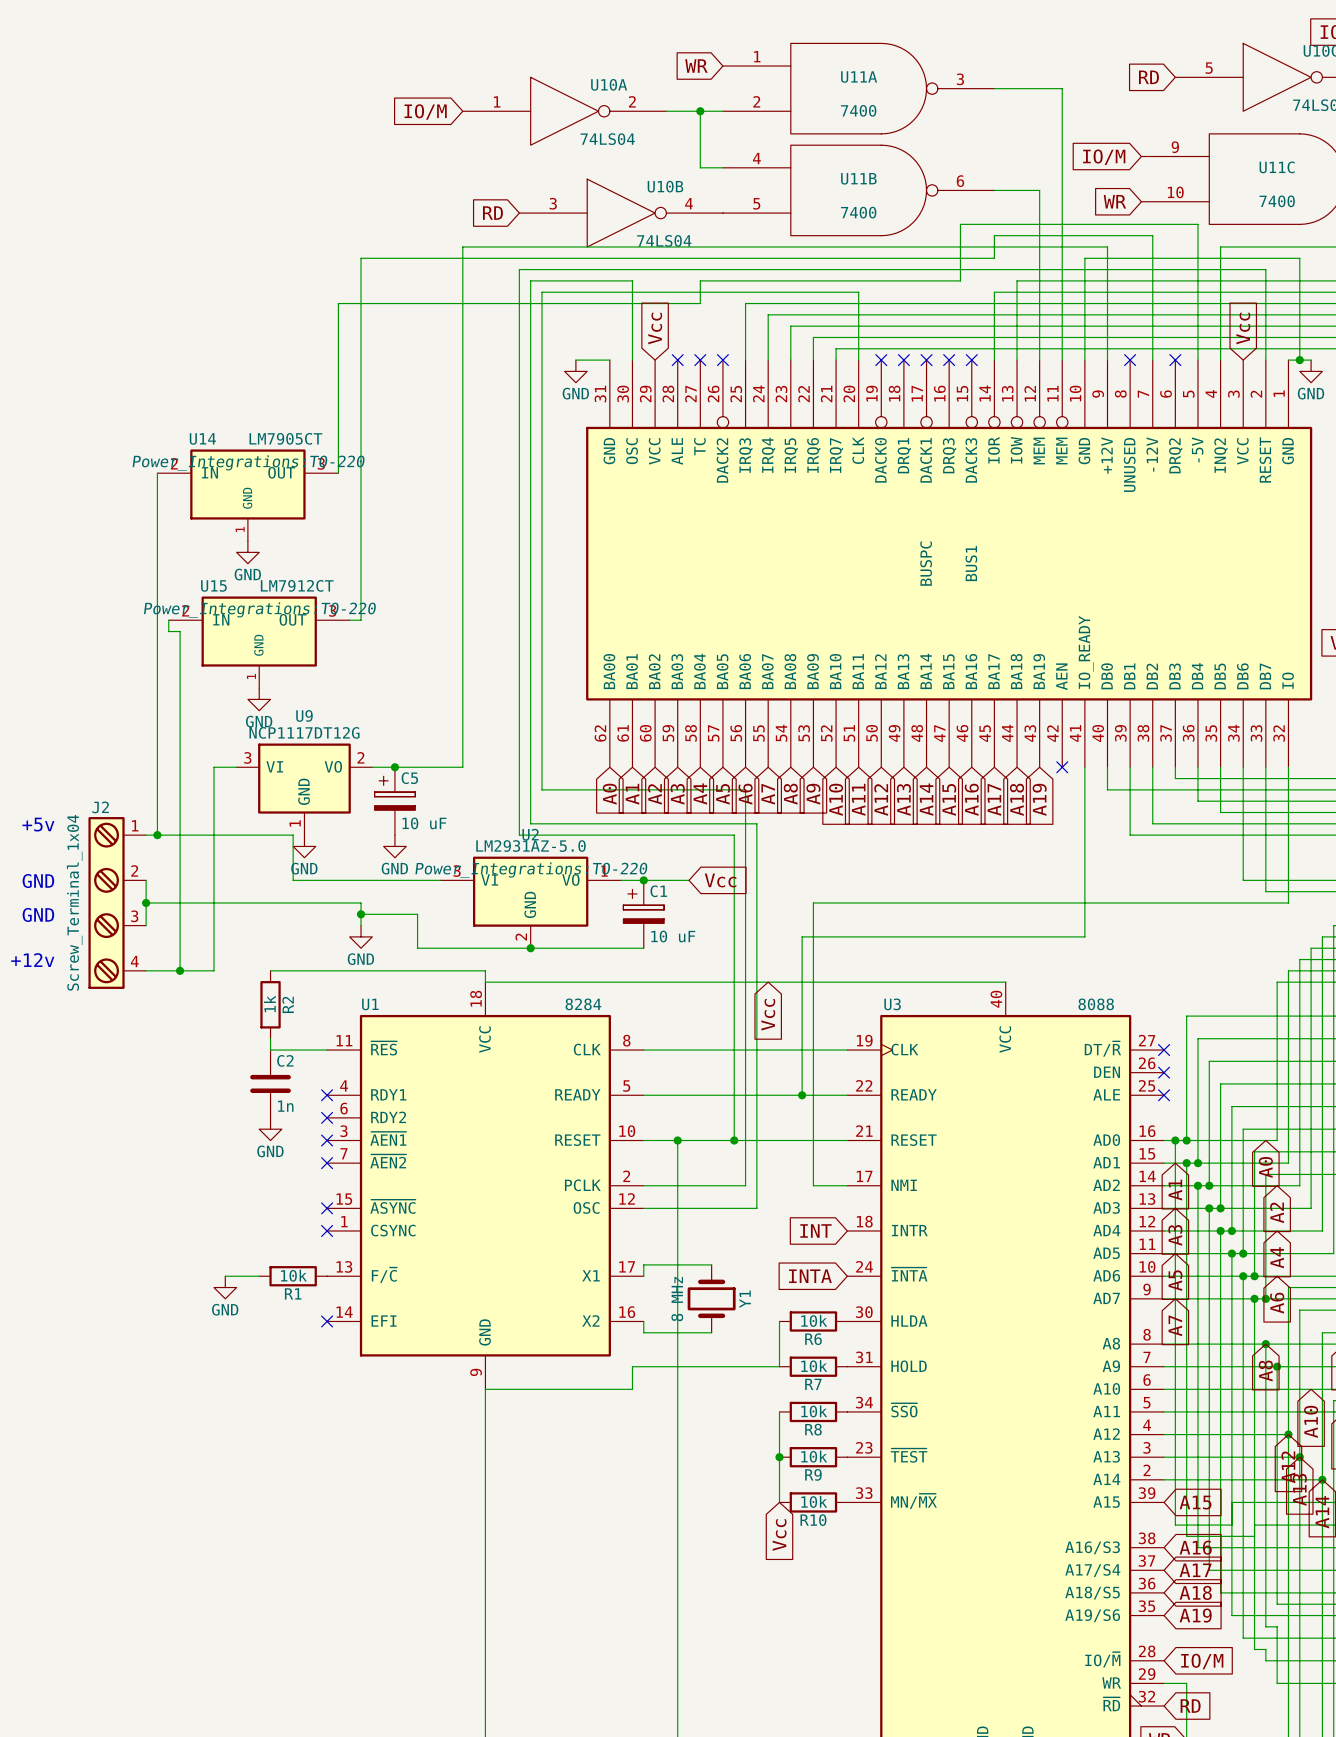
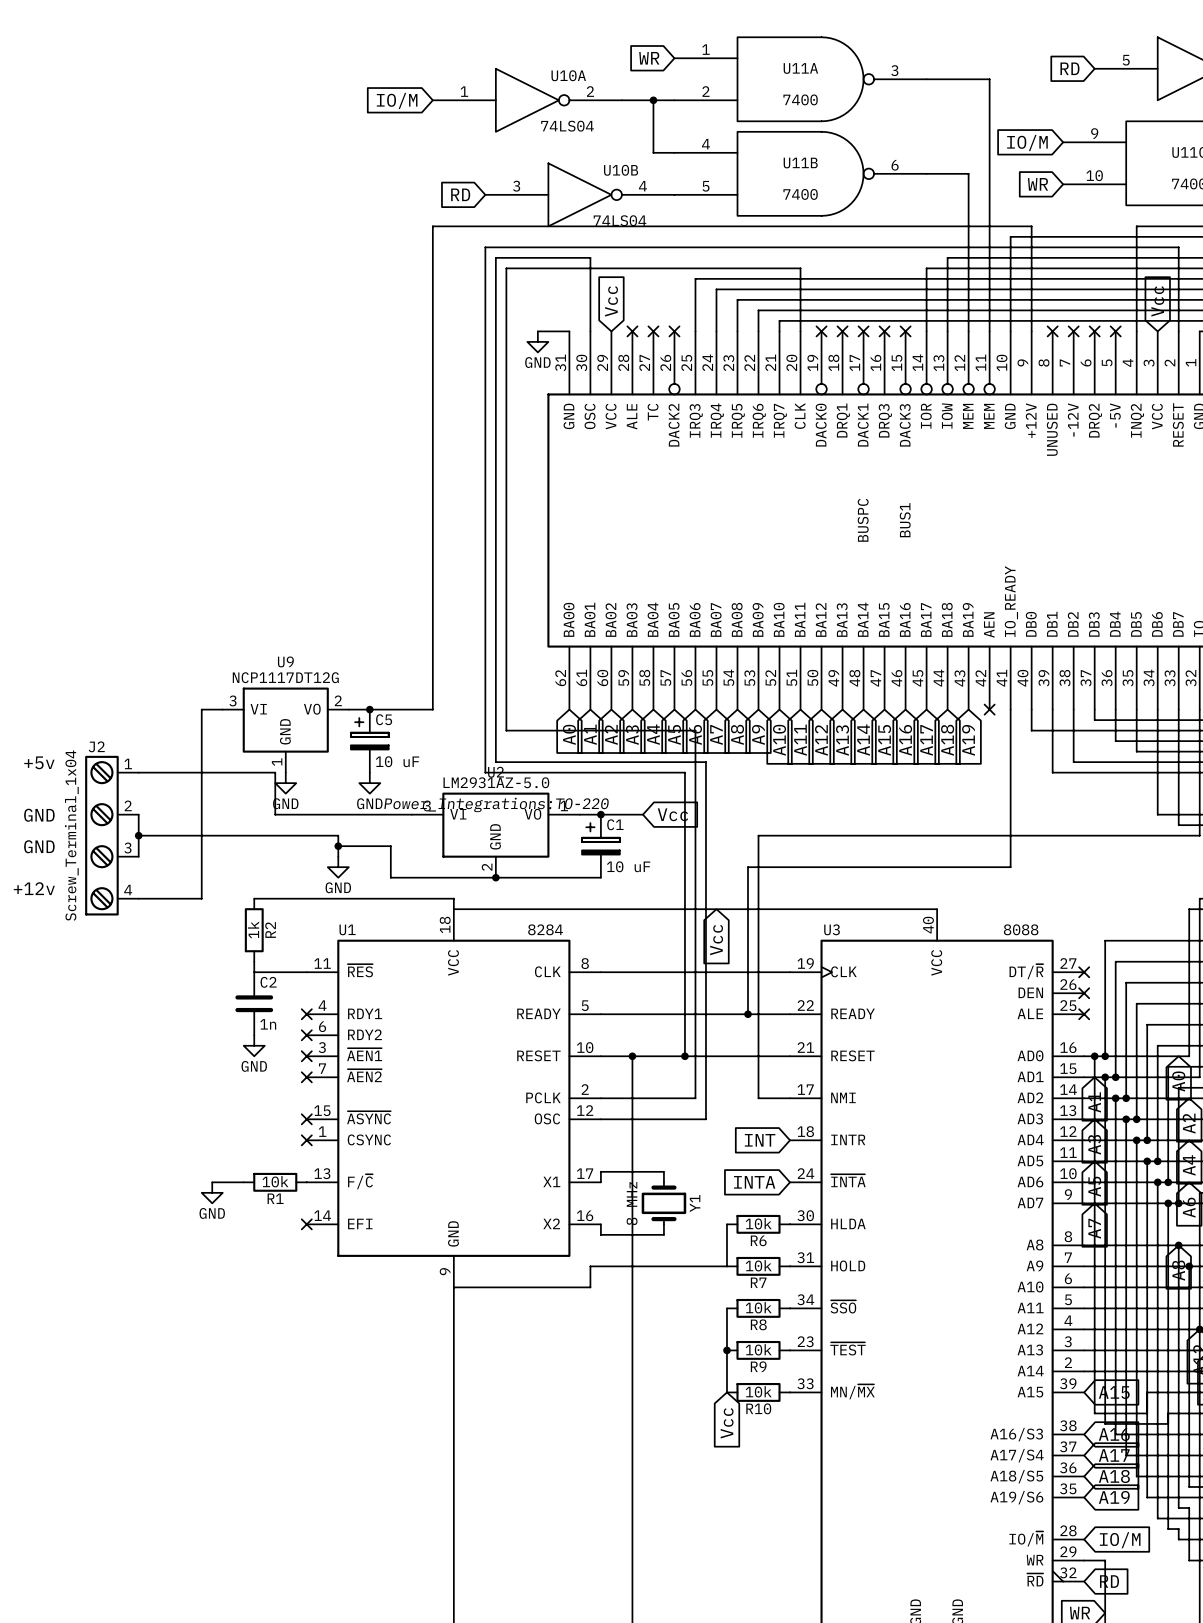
wire: (1152, 360) (1152, 235) (994, 235) (994, 258) (361, 258) (361, 620) (349, 620) -> none
no-connect mark: none -> (1073, 331)
wire: (1197, 360) (1197, 224) (960, 224) (960, 280) (700, 280) (700, 303) (338, 303) (338, 473) -> none
no-connect mark: none -> (1115, 331)
wire: (157, 473) (157, 835) -> none
U14: LM7905CT (247, 495) -> none
power symbol: GND (247, 552) -> none
wire: (168, 620) (168, 631) (180, 631) (180, 970) -> none
U15: LM7912CT (259, 642) -> none
power symbol: GND (259, 699) -> none
junction: (157, 835) -> none
junction: (180, 970) -> none

